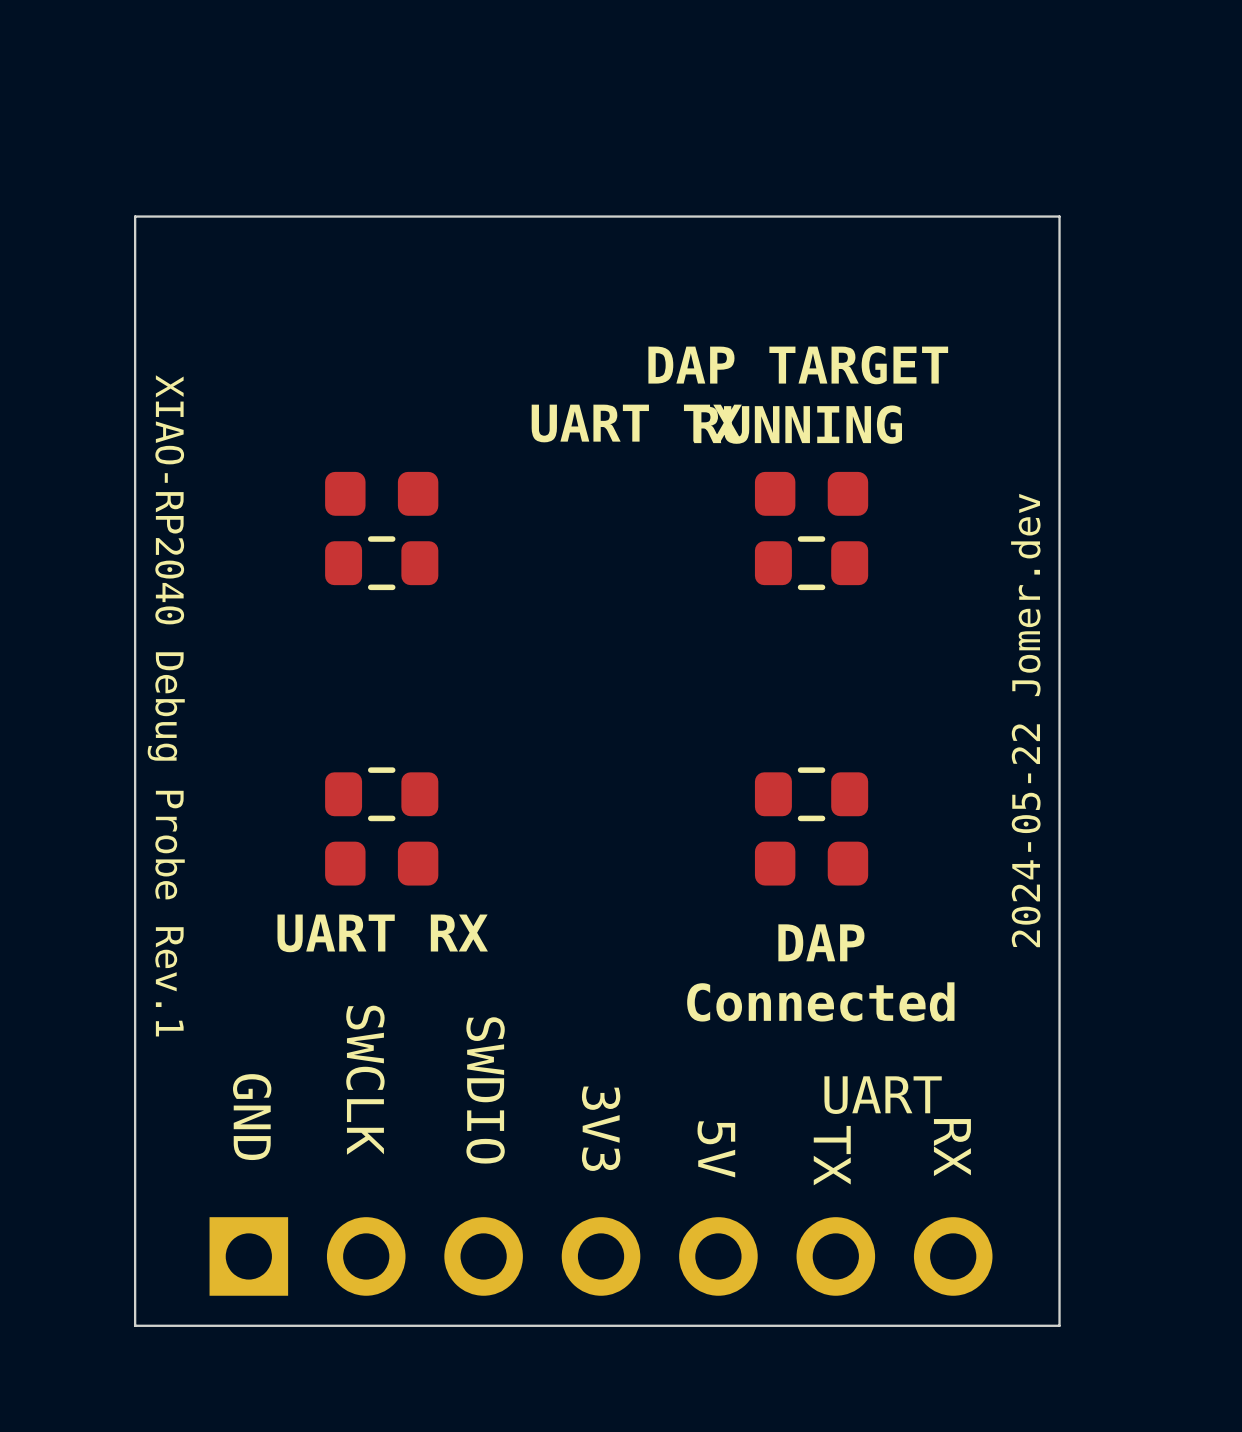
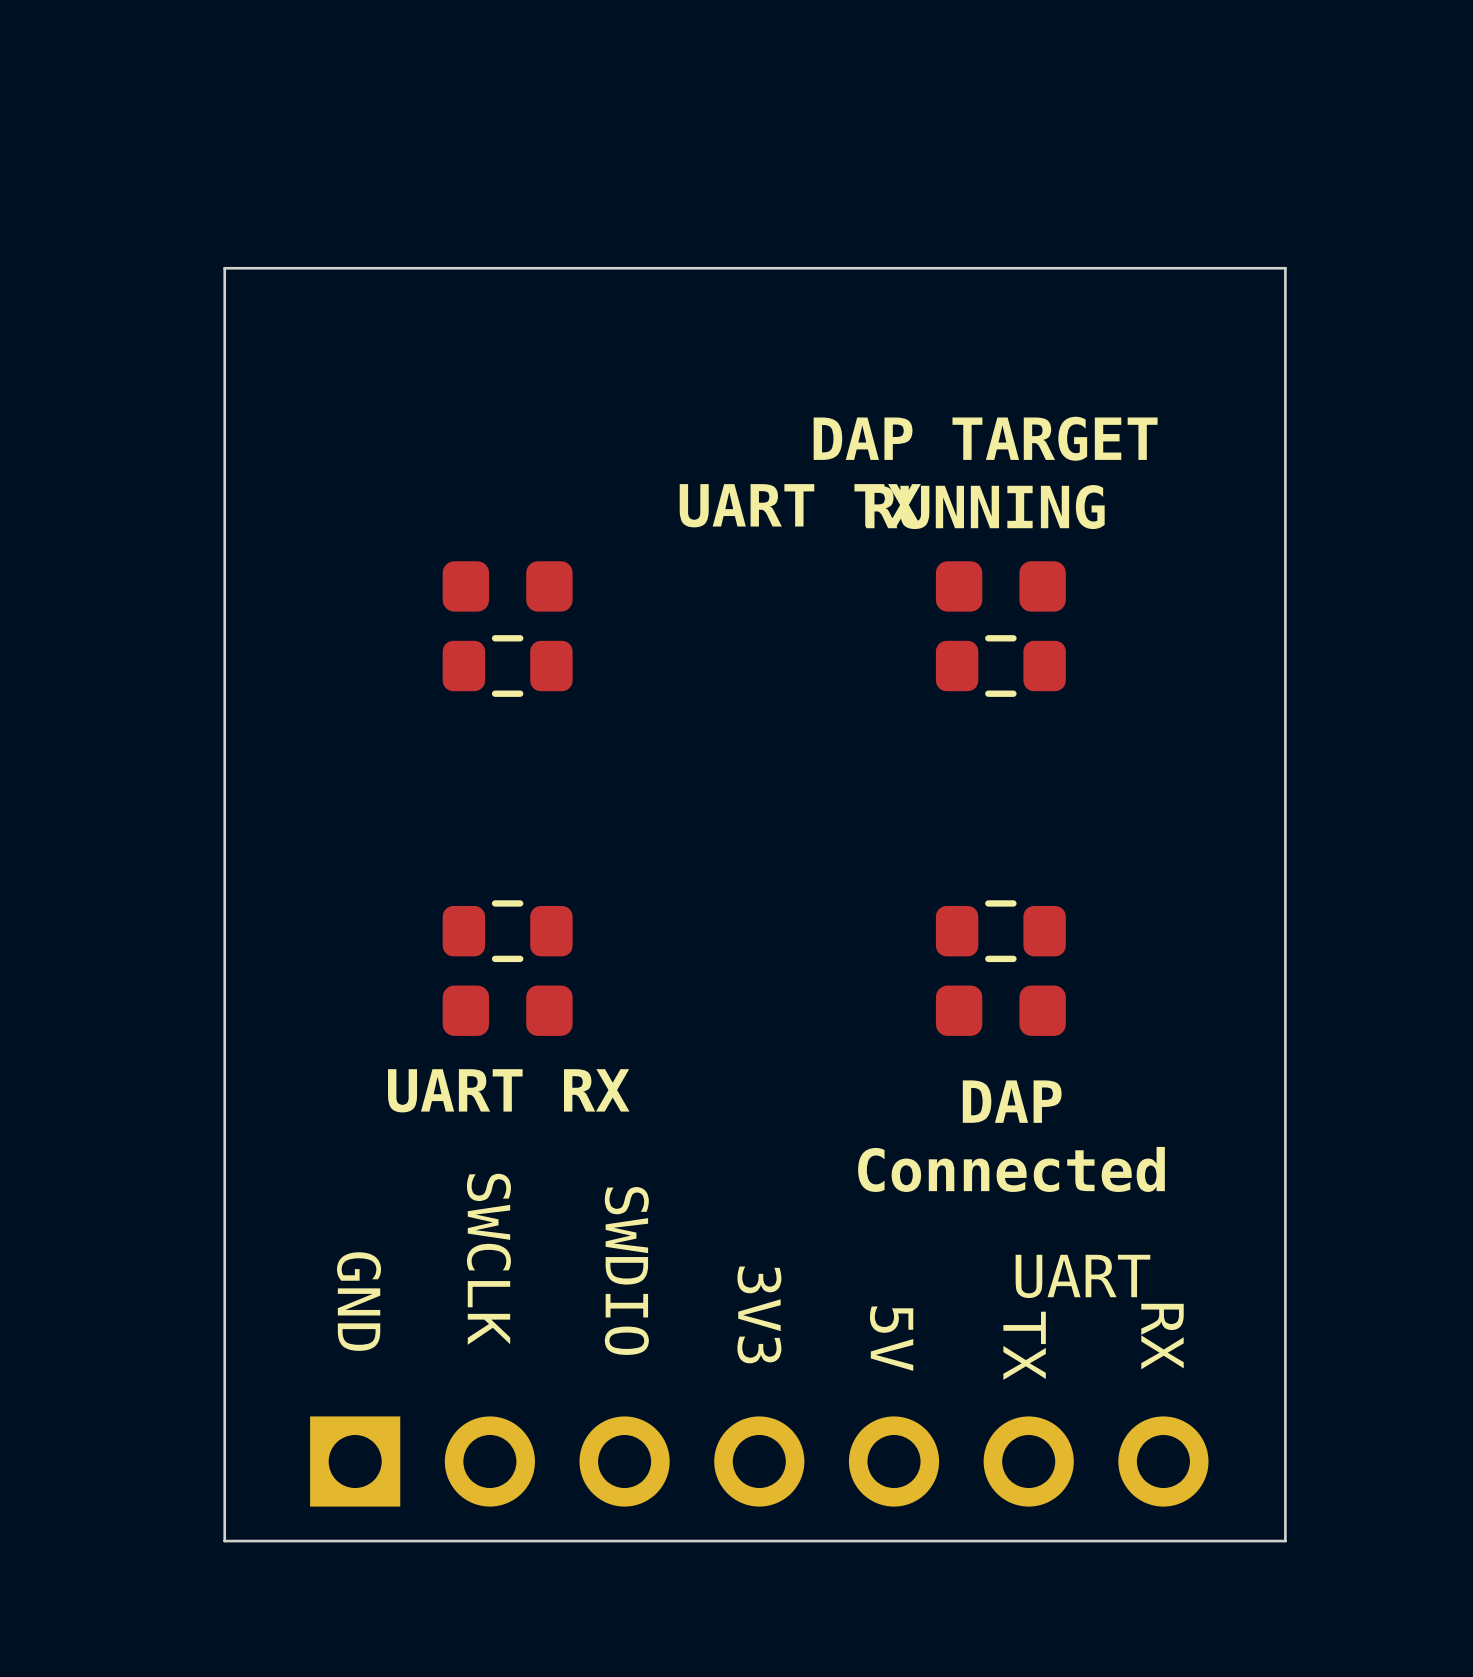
text: XIAO-RP2040 Debug Probe Rev.1 (166, 705) -> none
text: 2024-05-22 Jomer.dev (1025, 720) -> none

